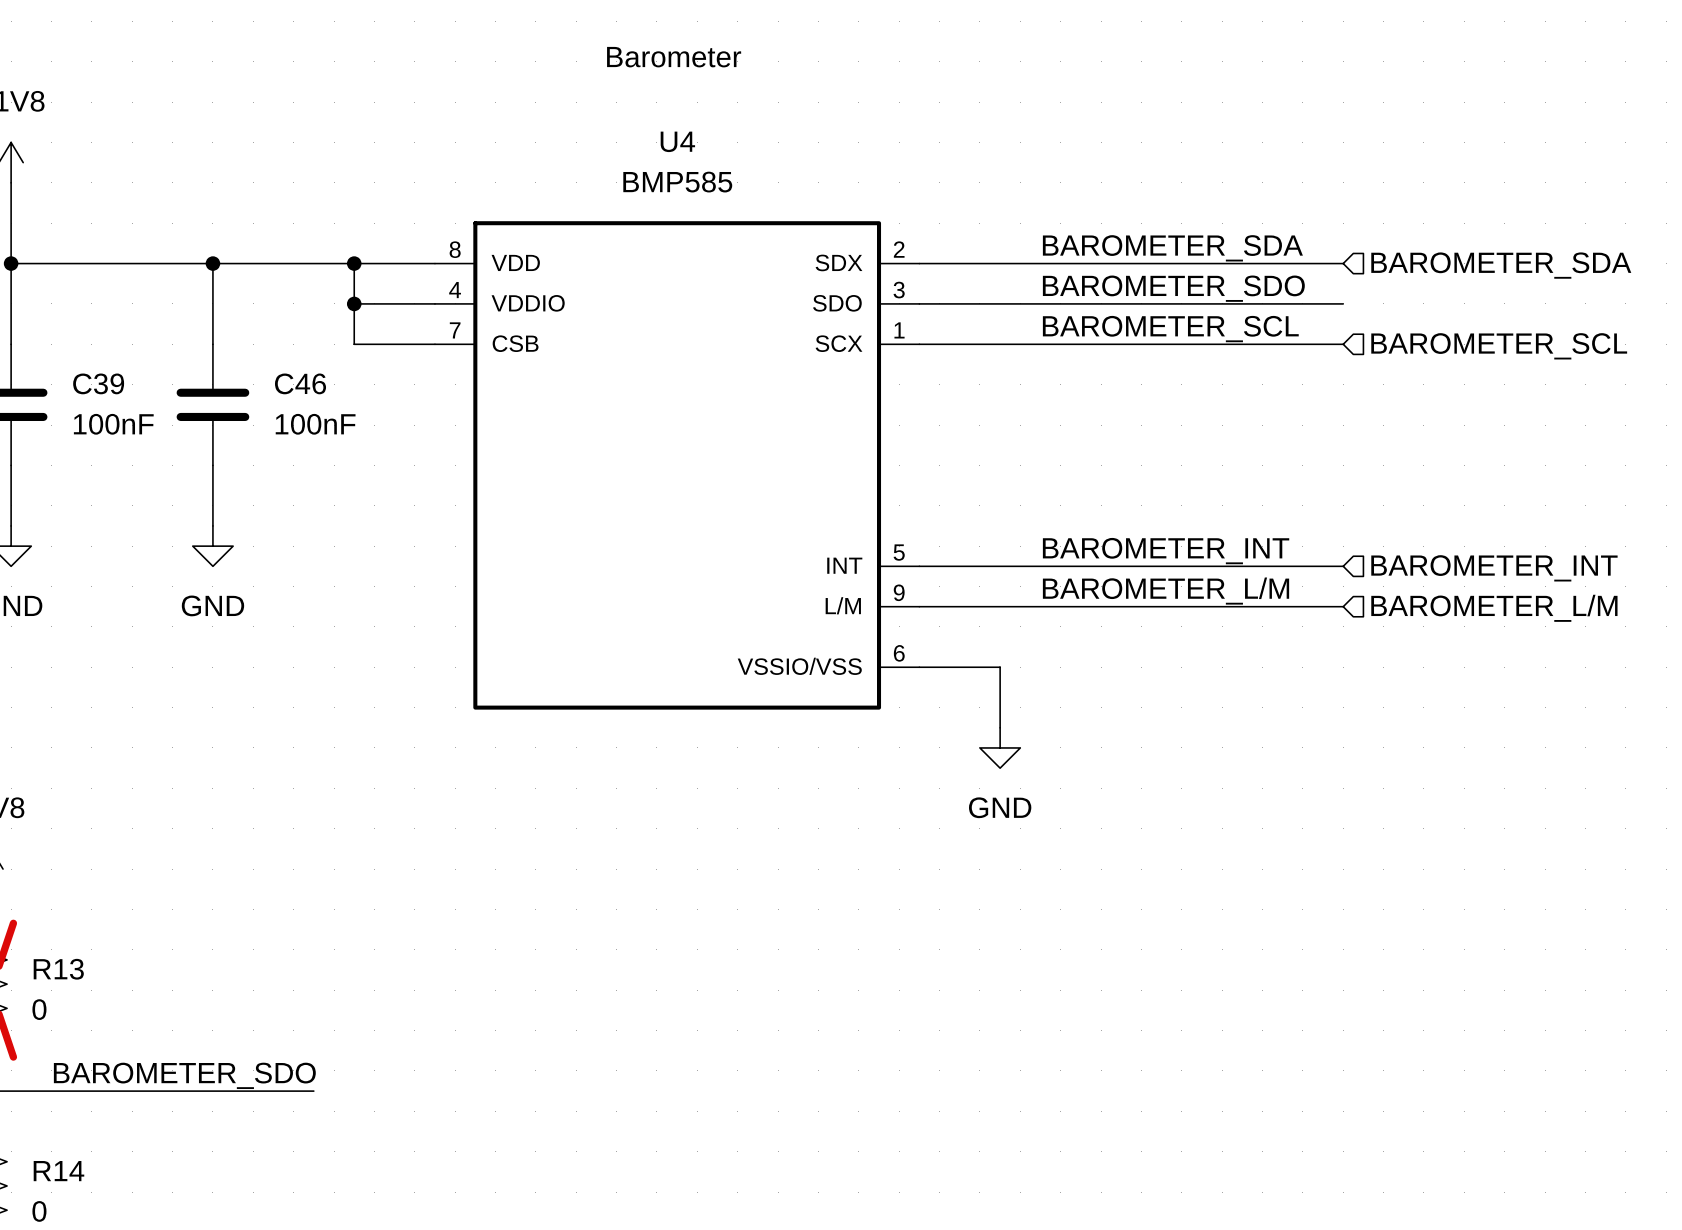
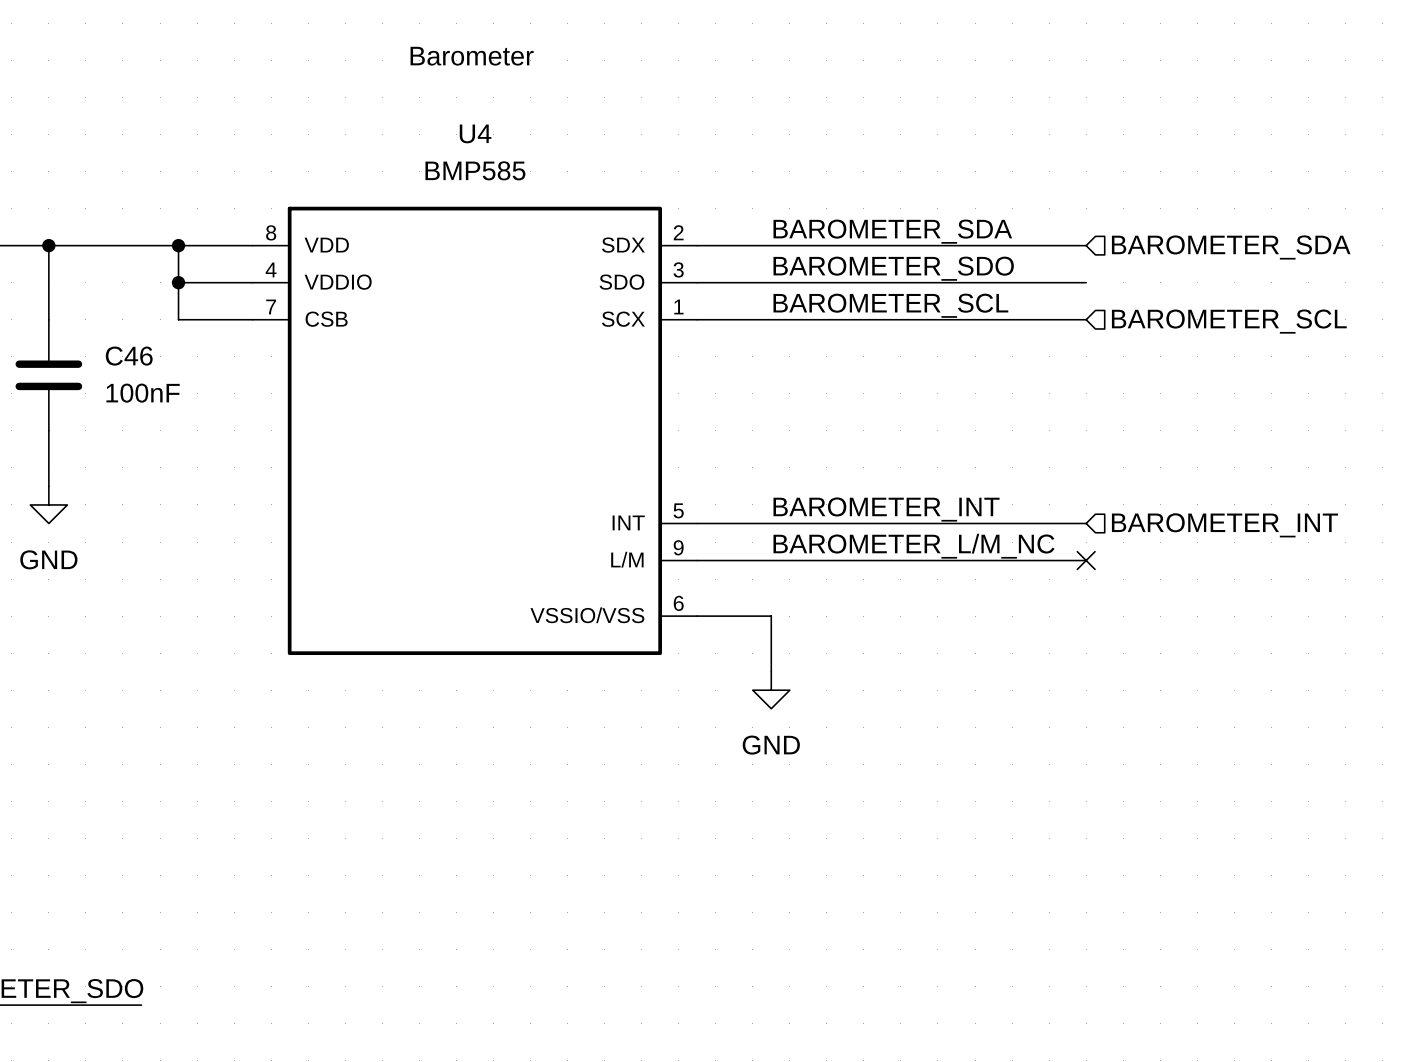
label position: BAROMETER_SDA (1172, 248) -> BAROMETER_SDA (892, 231)
label position: BAROMETER_SDO (1173, 288) -> BAROMETER_SDO (893, 268)
label position: BAROMETER_SCL (1170, 329) -> BAROMETER_SCL (890, 305)
label position: BAROMETER_INT (1166, 551) -> BAROMETER_INT (886, 509)
label: BAROMETER_L/M (1166, 591) -> BAROMETER_L/M_NC (914, 546)
no-connect mark: none -> (1086, 560)
hierarchical label: BAROMETER_L/M (1494, 608) -> none

